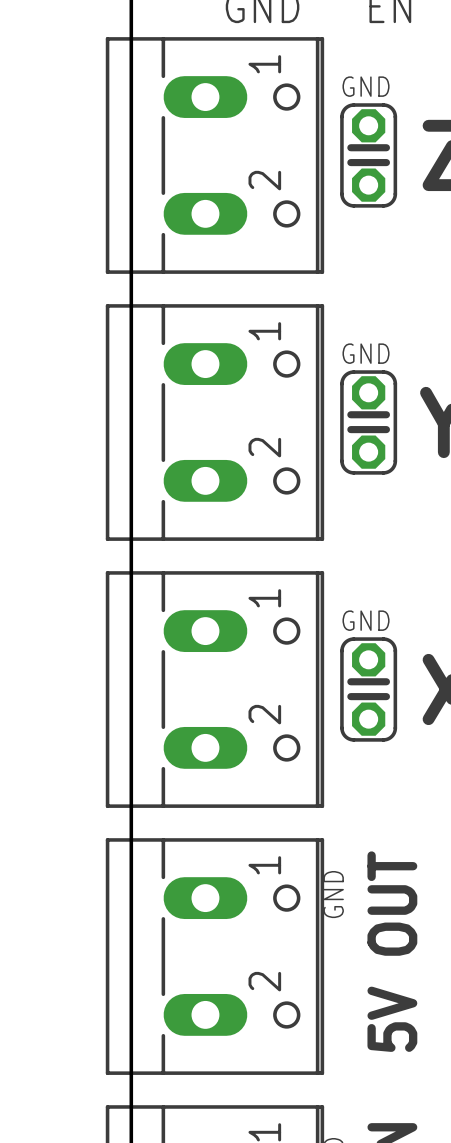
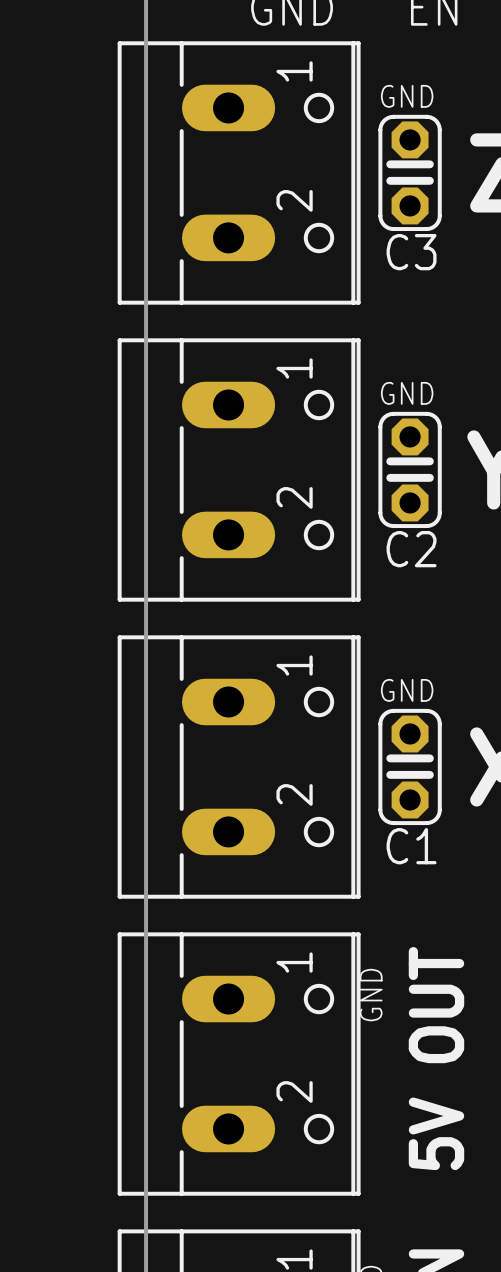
C3 name: none -> C3 (411, 252)
C2 name: none -> C2 (411, 549)
C1 name: none -> C1 (411, 846)

